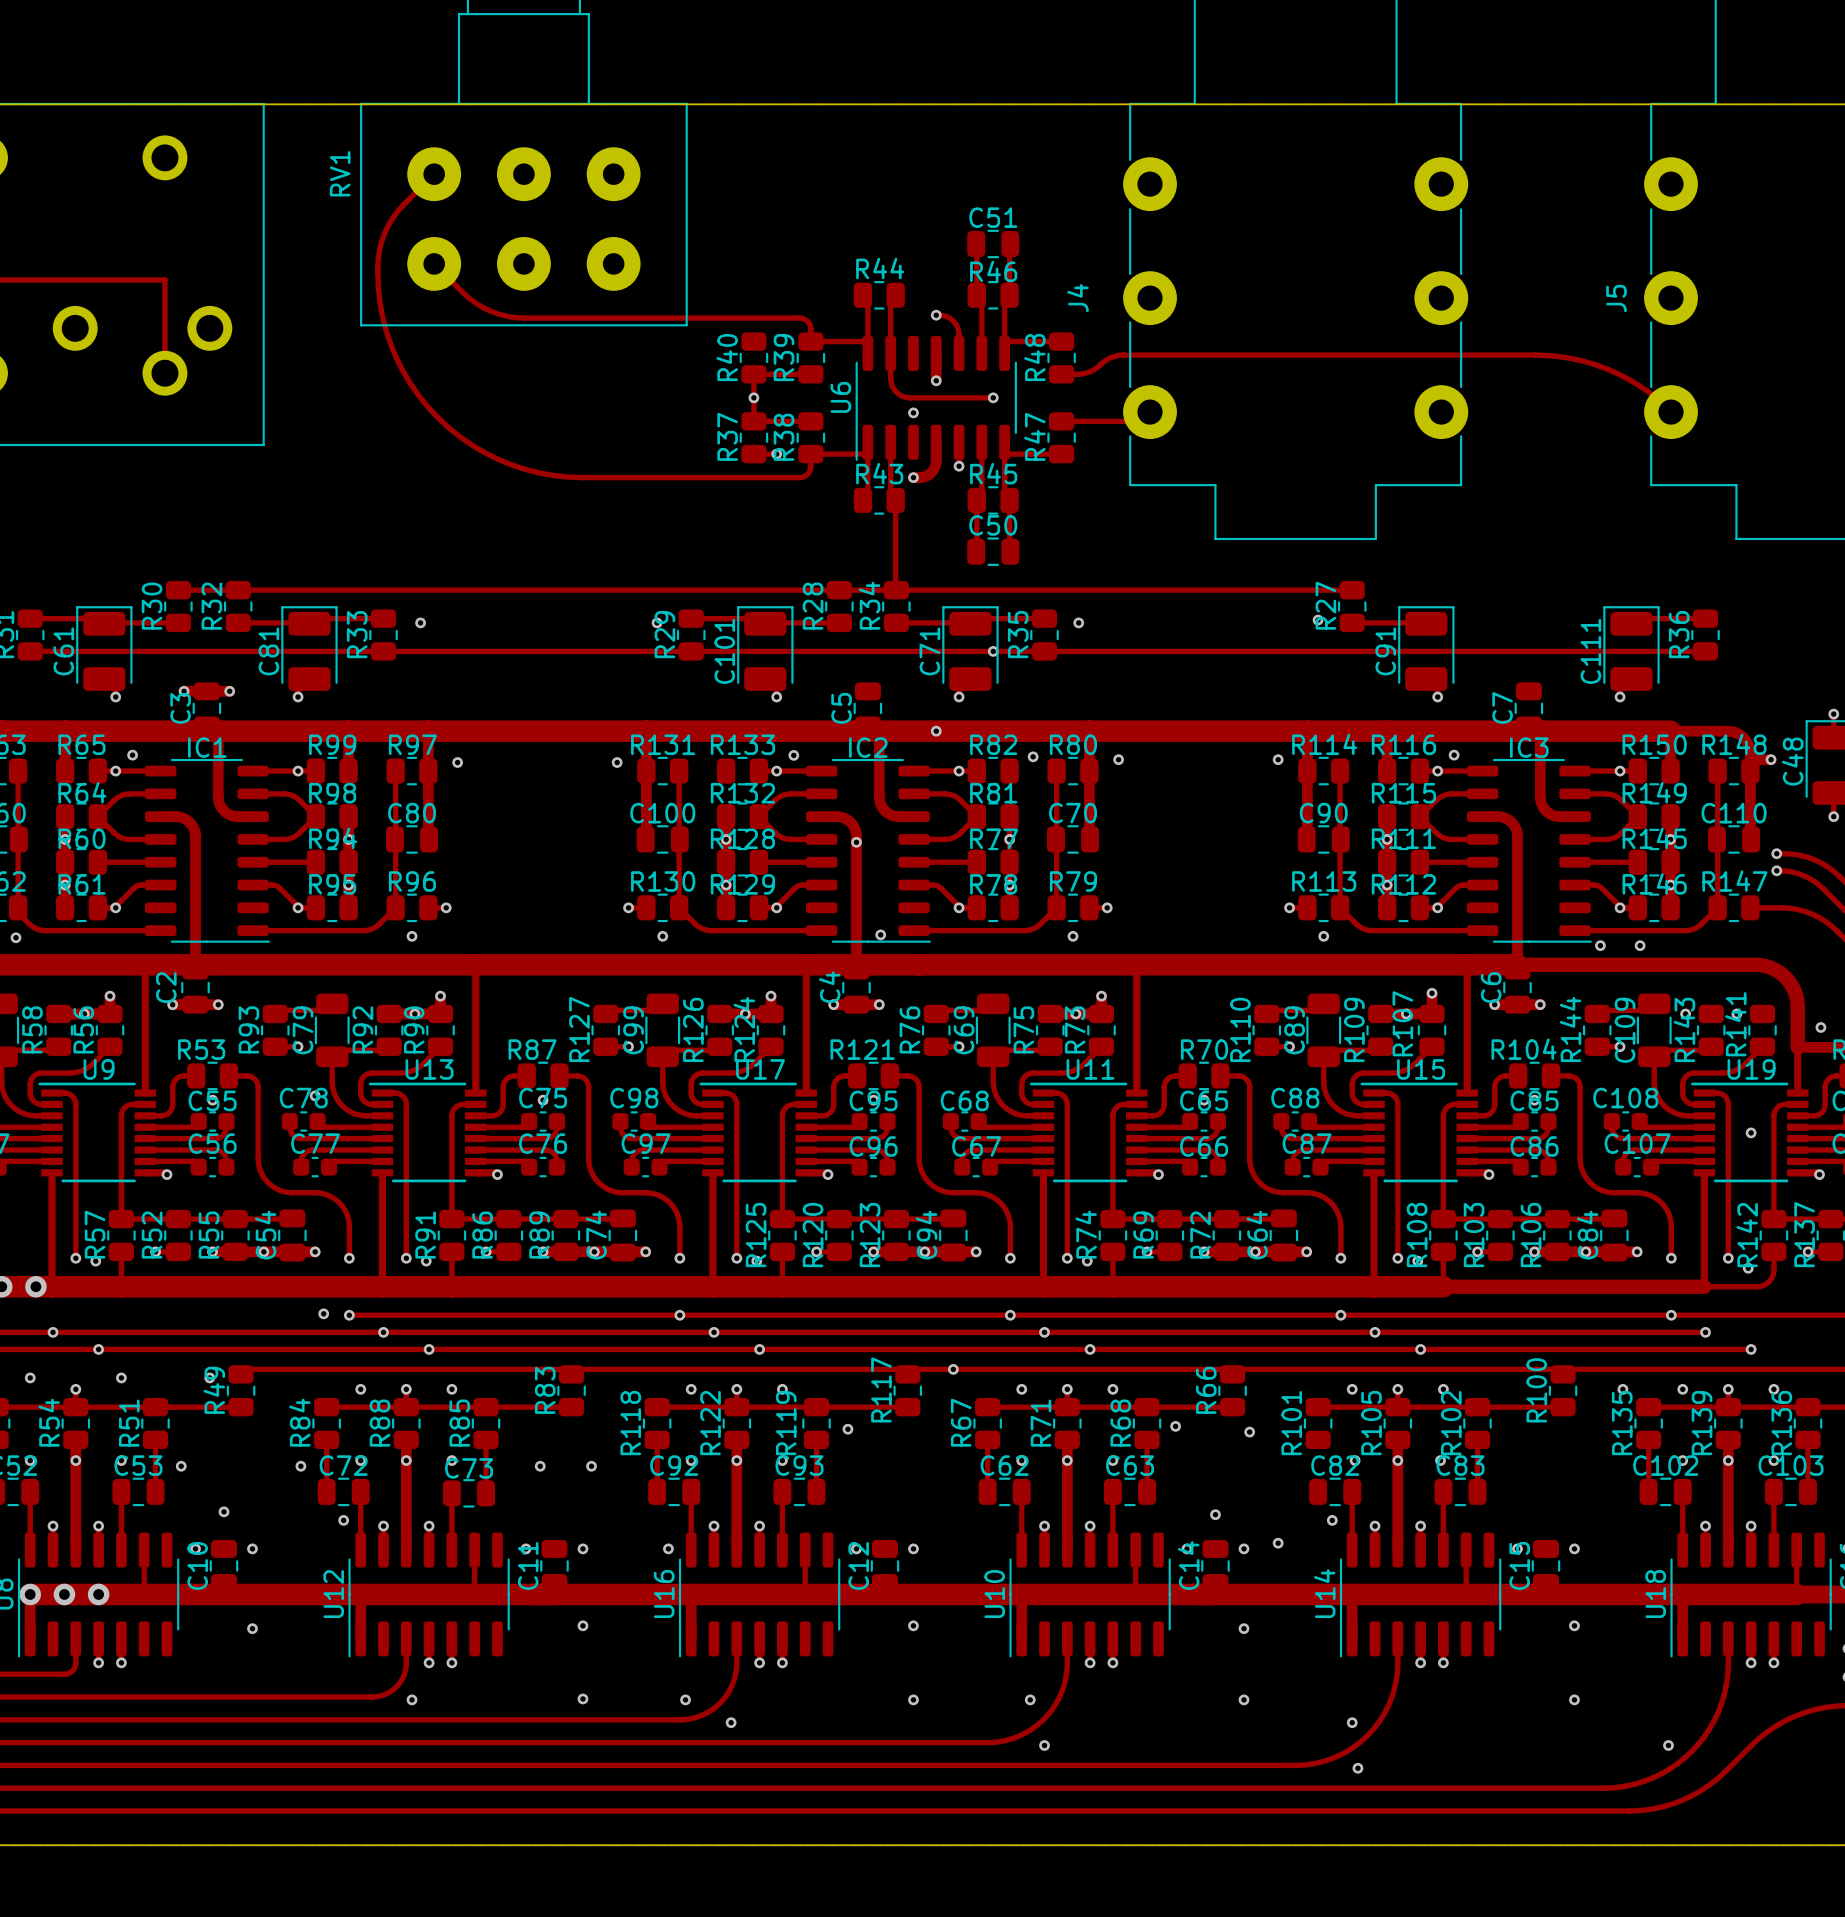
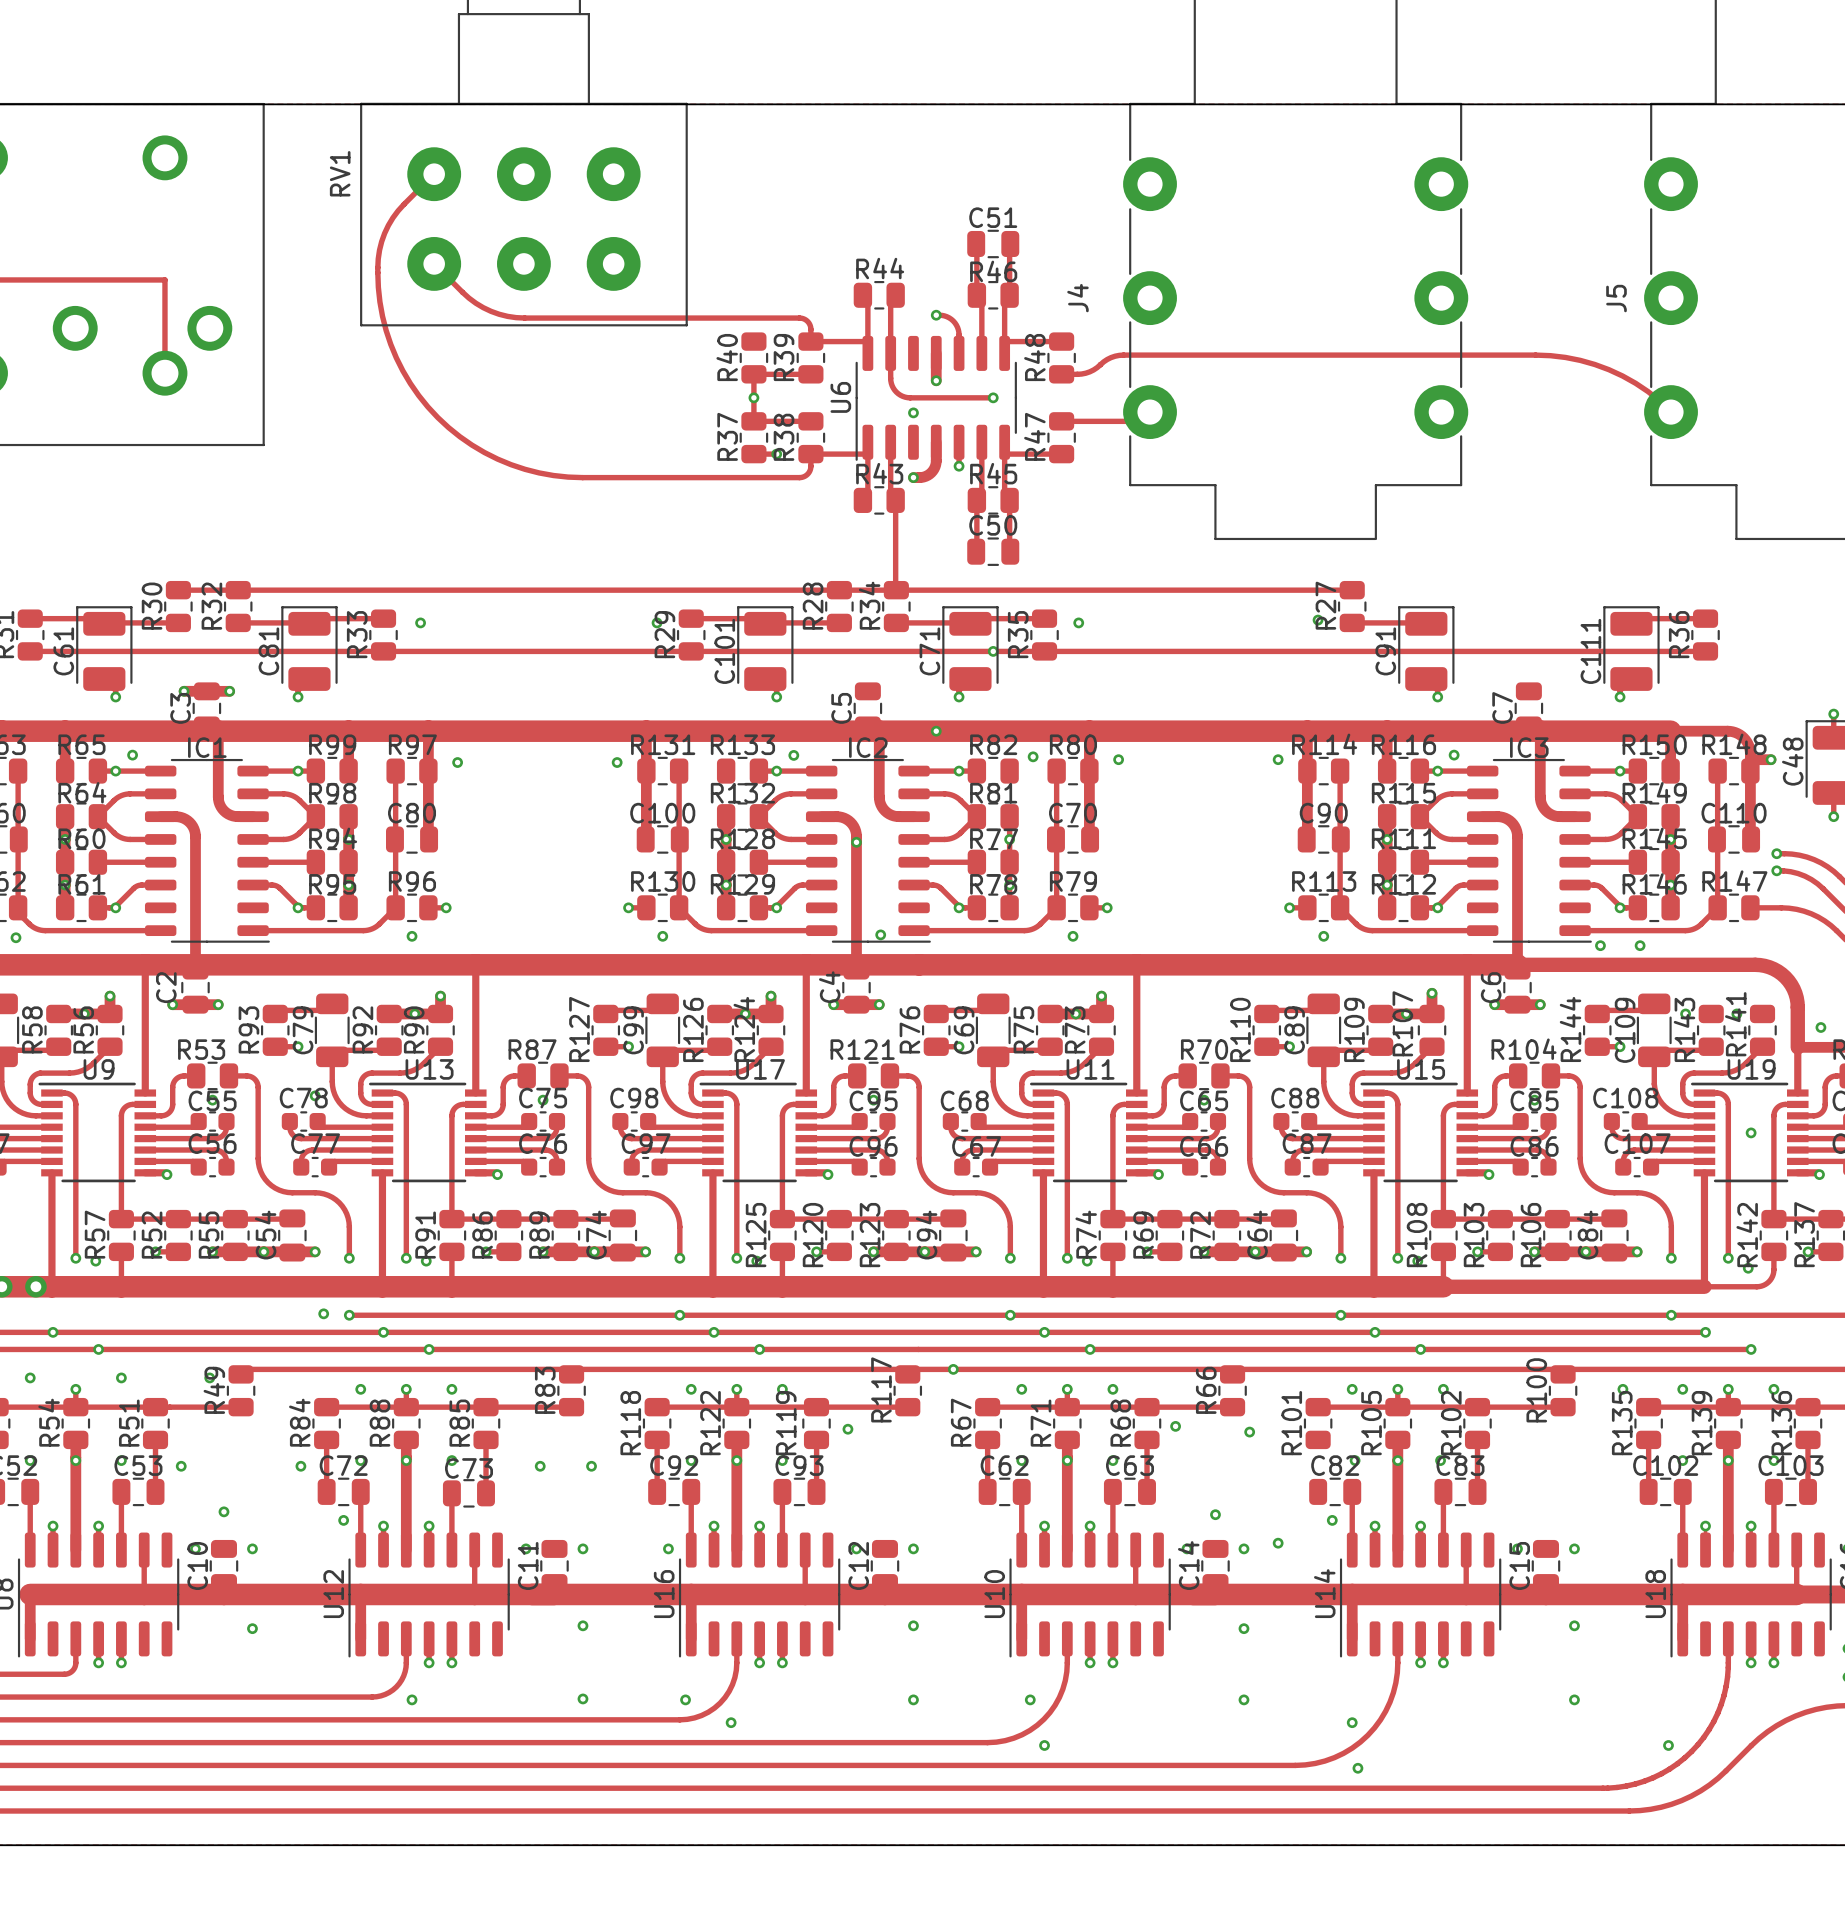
via: (30, 1594) -> none
via: (64, 1594) -> none
via: (98, 1594) -> none

